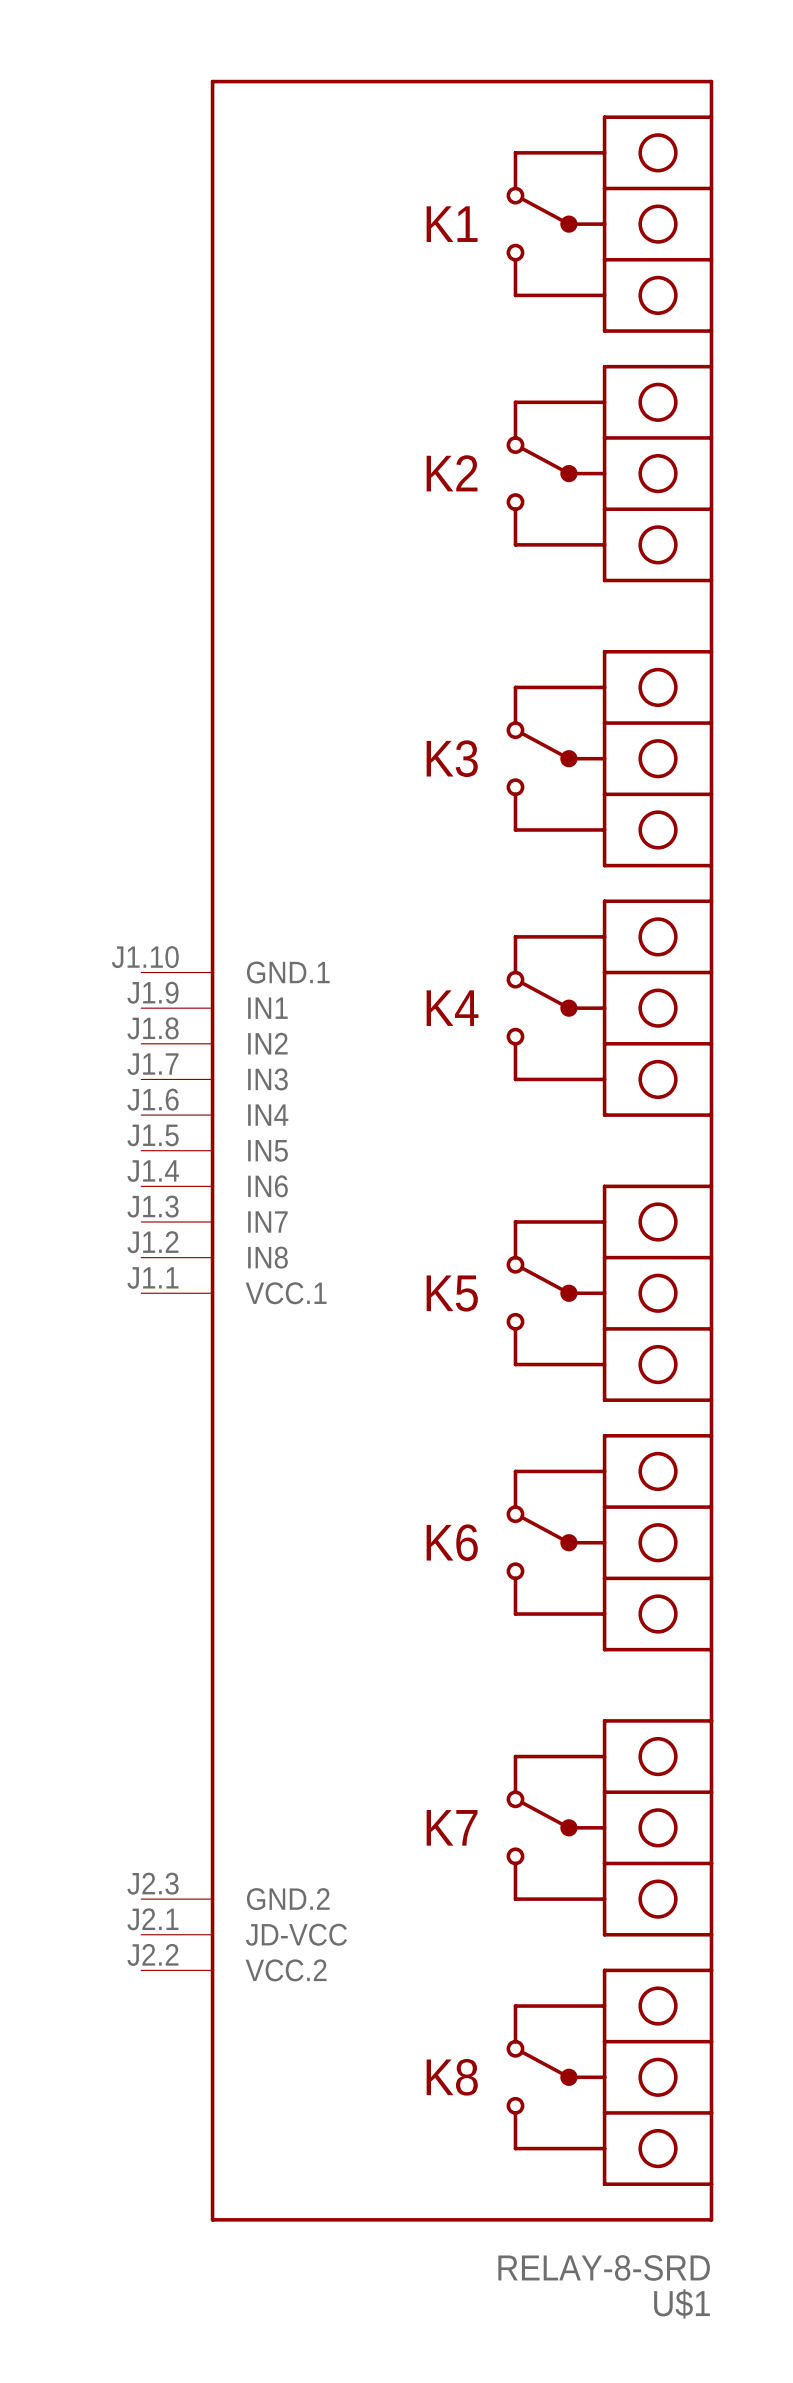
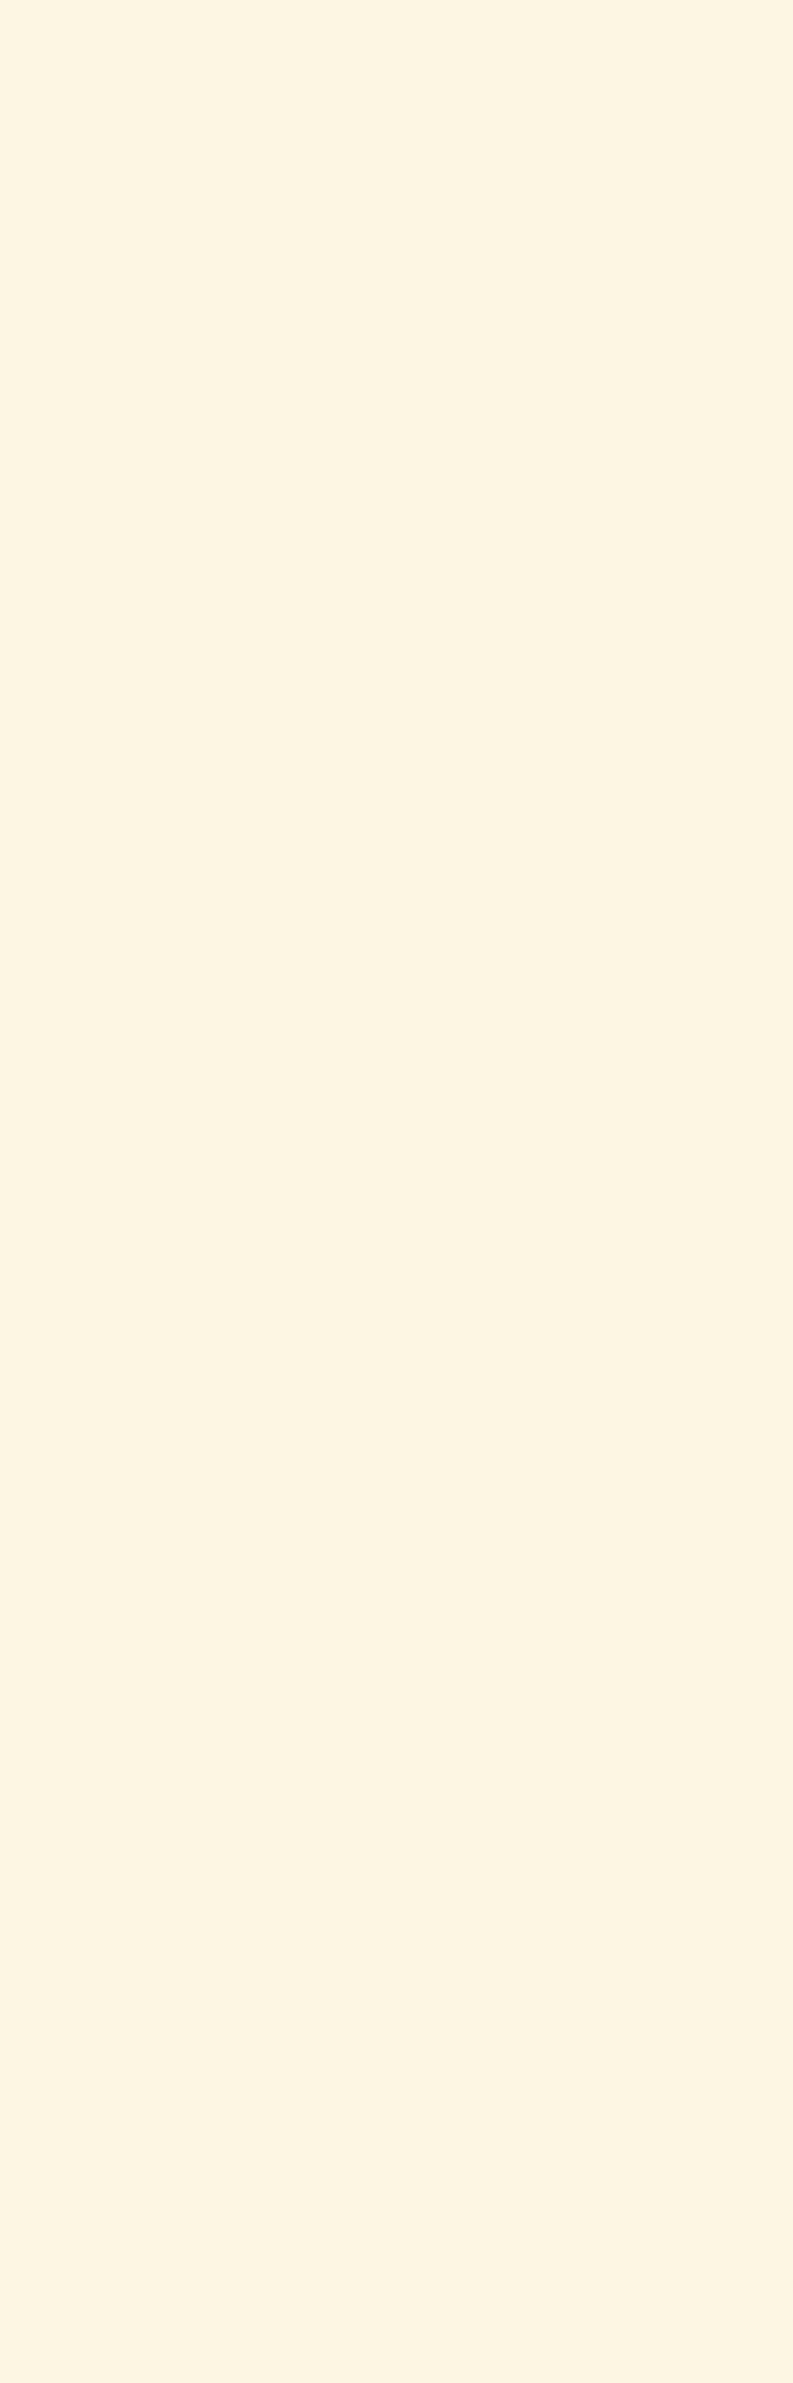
U$1: RELAY-8-SRD (427, 1150) -> none

